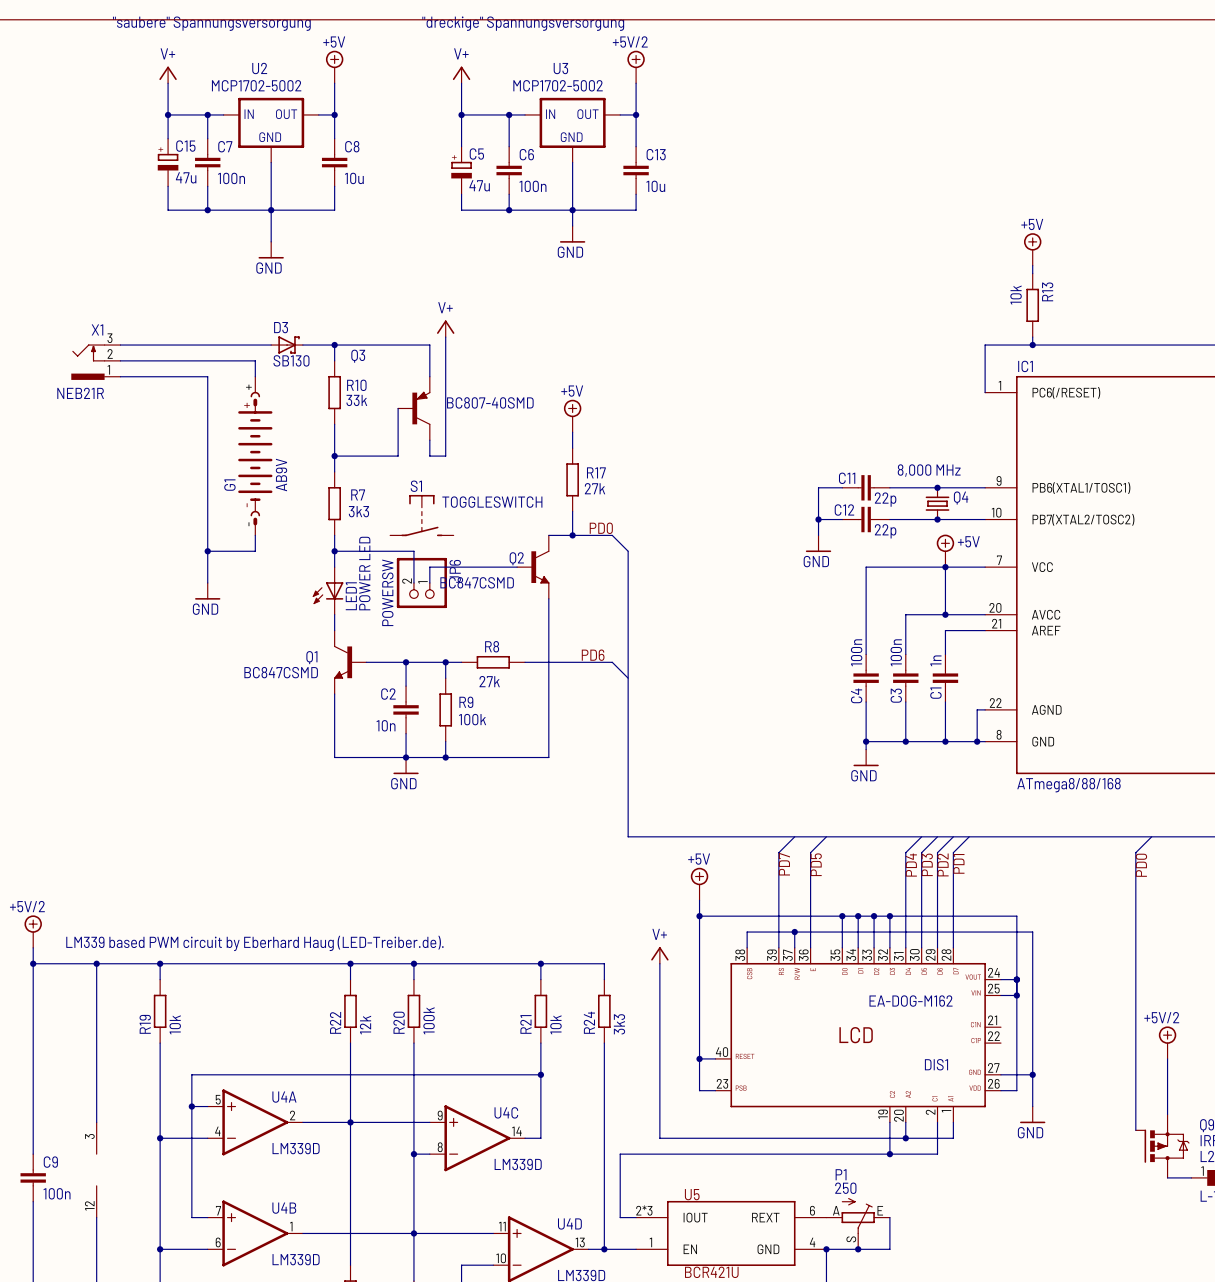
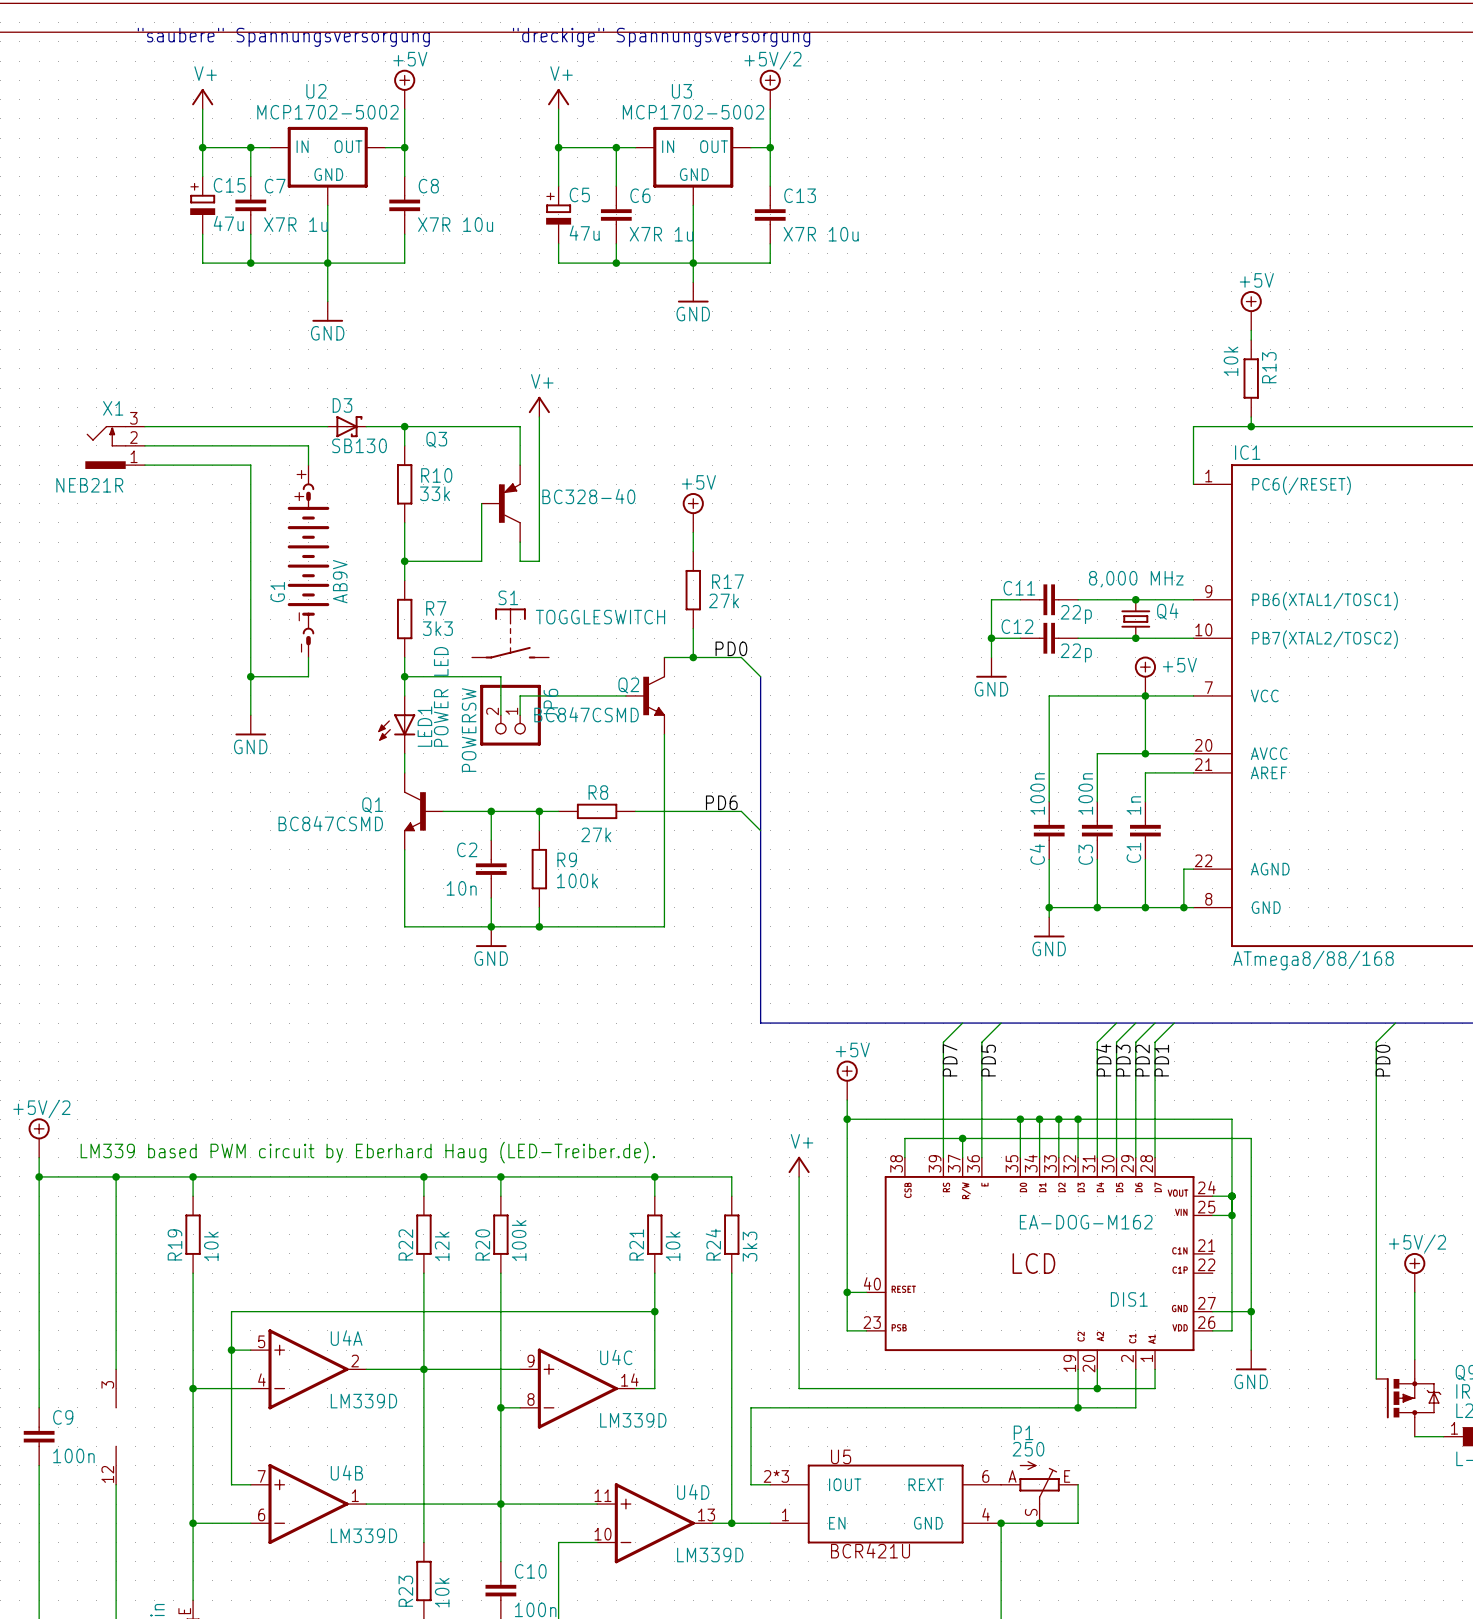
C7 value: 100n (231, 178) -> X7R 1u (295, 224)
C8 value: 10u (354, 178) -> X7R 10u (455, 224)
C6 value: 100n (532, 186) -> X7R 1u (661, 234)
C13 value: 10u (655, 186) -> X7R 10u (821, 234)
Q3 value: BC807-40SMD (490, 402) -> BC328-40 (588, 496)

